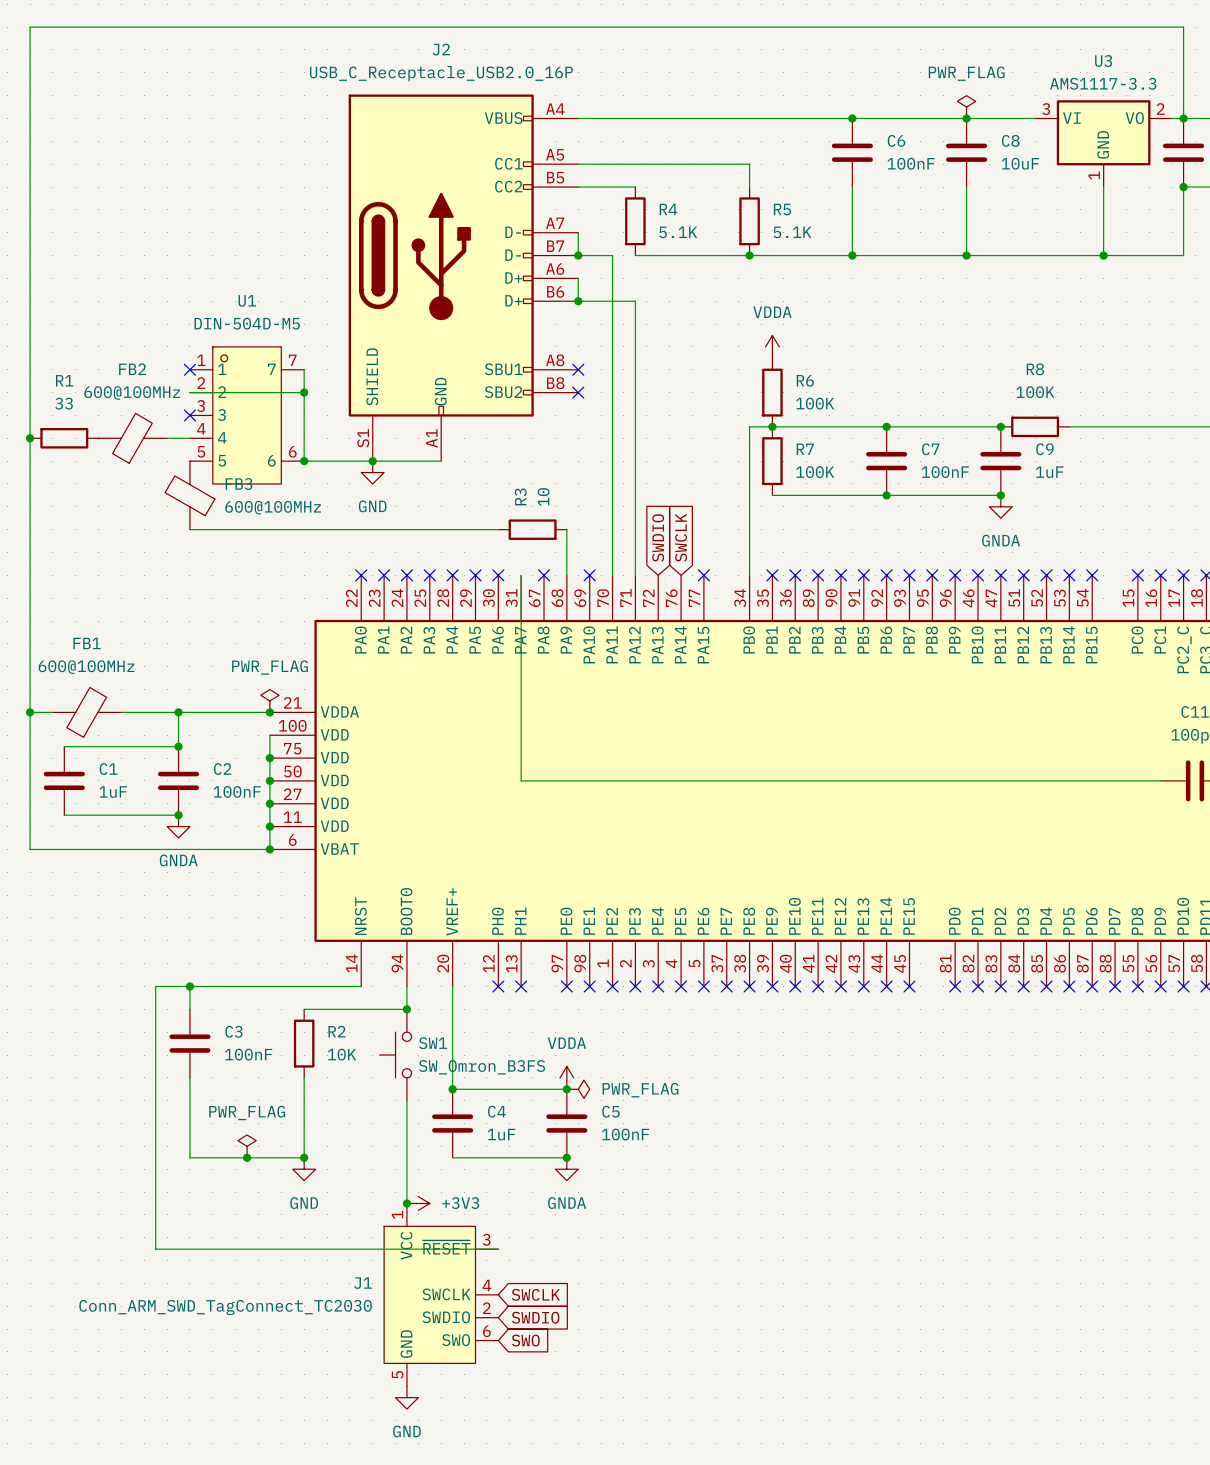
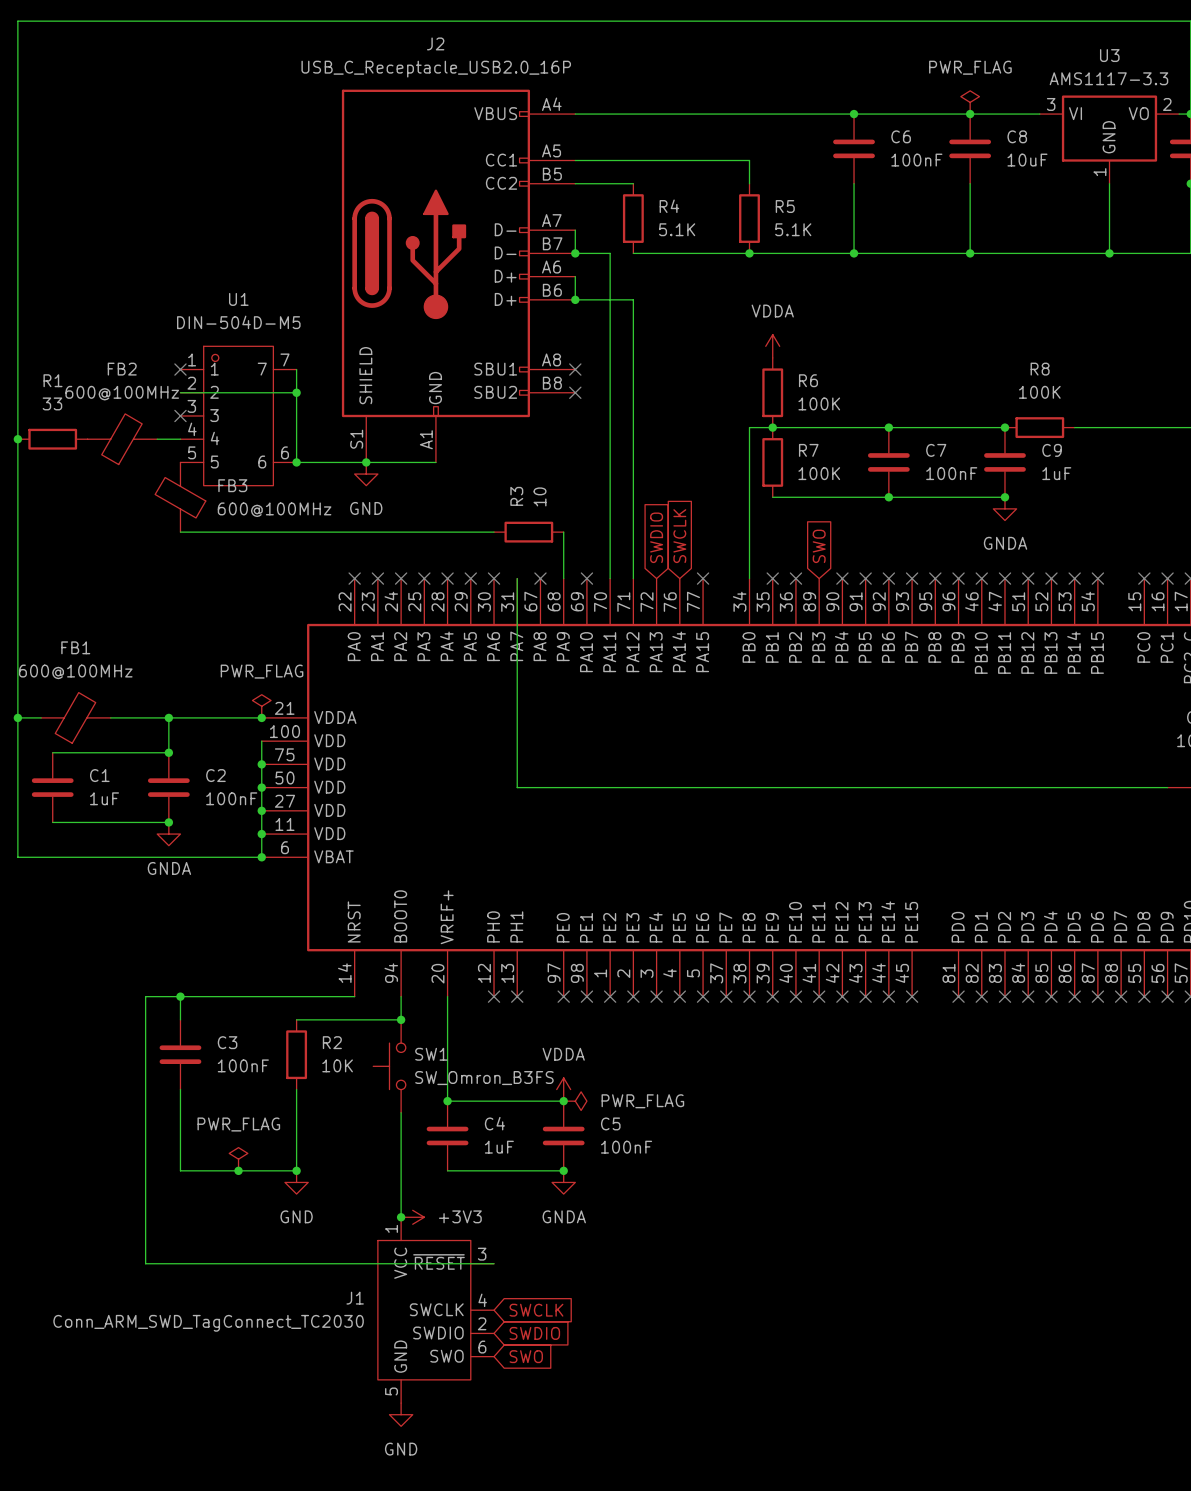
global label: none -> SWO (819, 546)
no-connect mark: (818, 575) -> none

